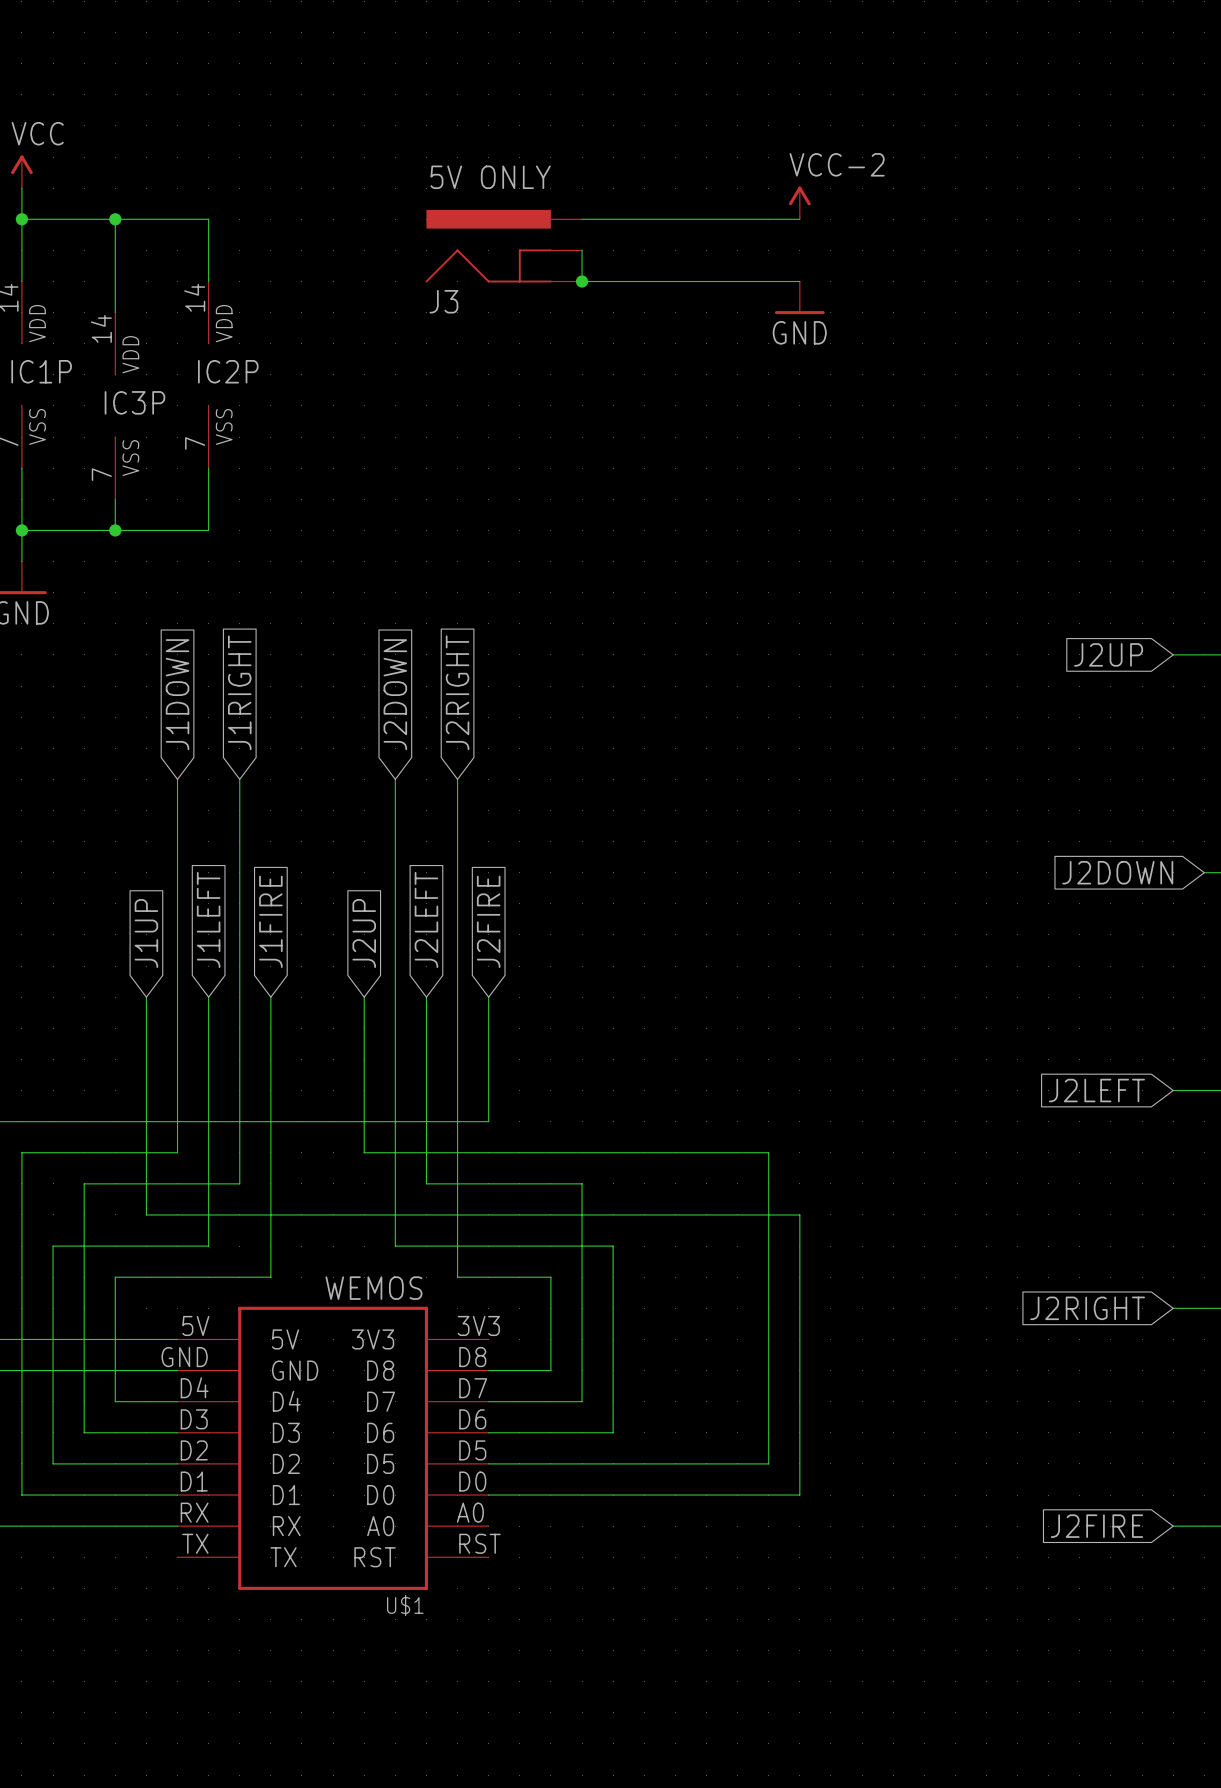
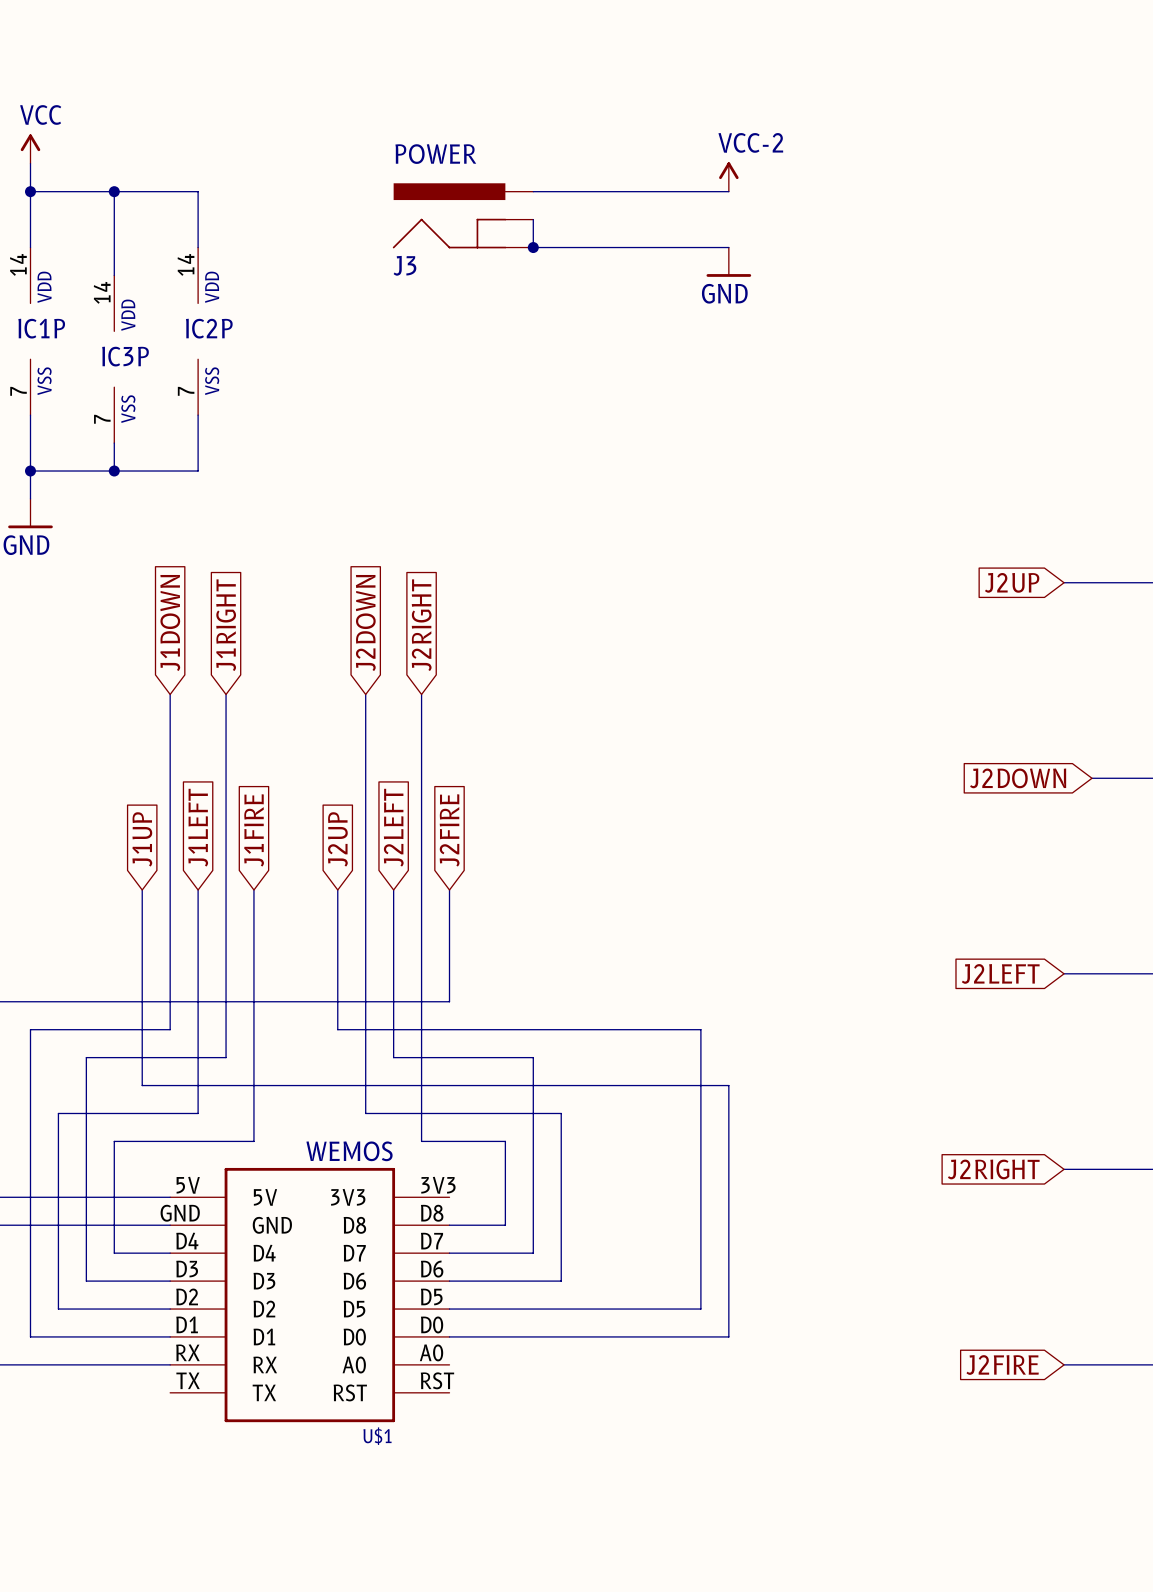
J3 value: 5V ONLY (490, 177) -> POWER (435, 154)

